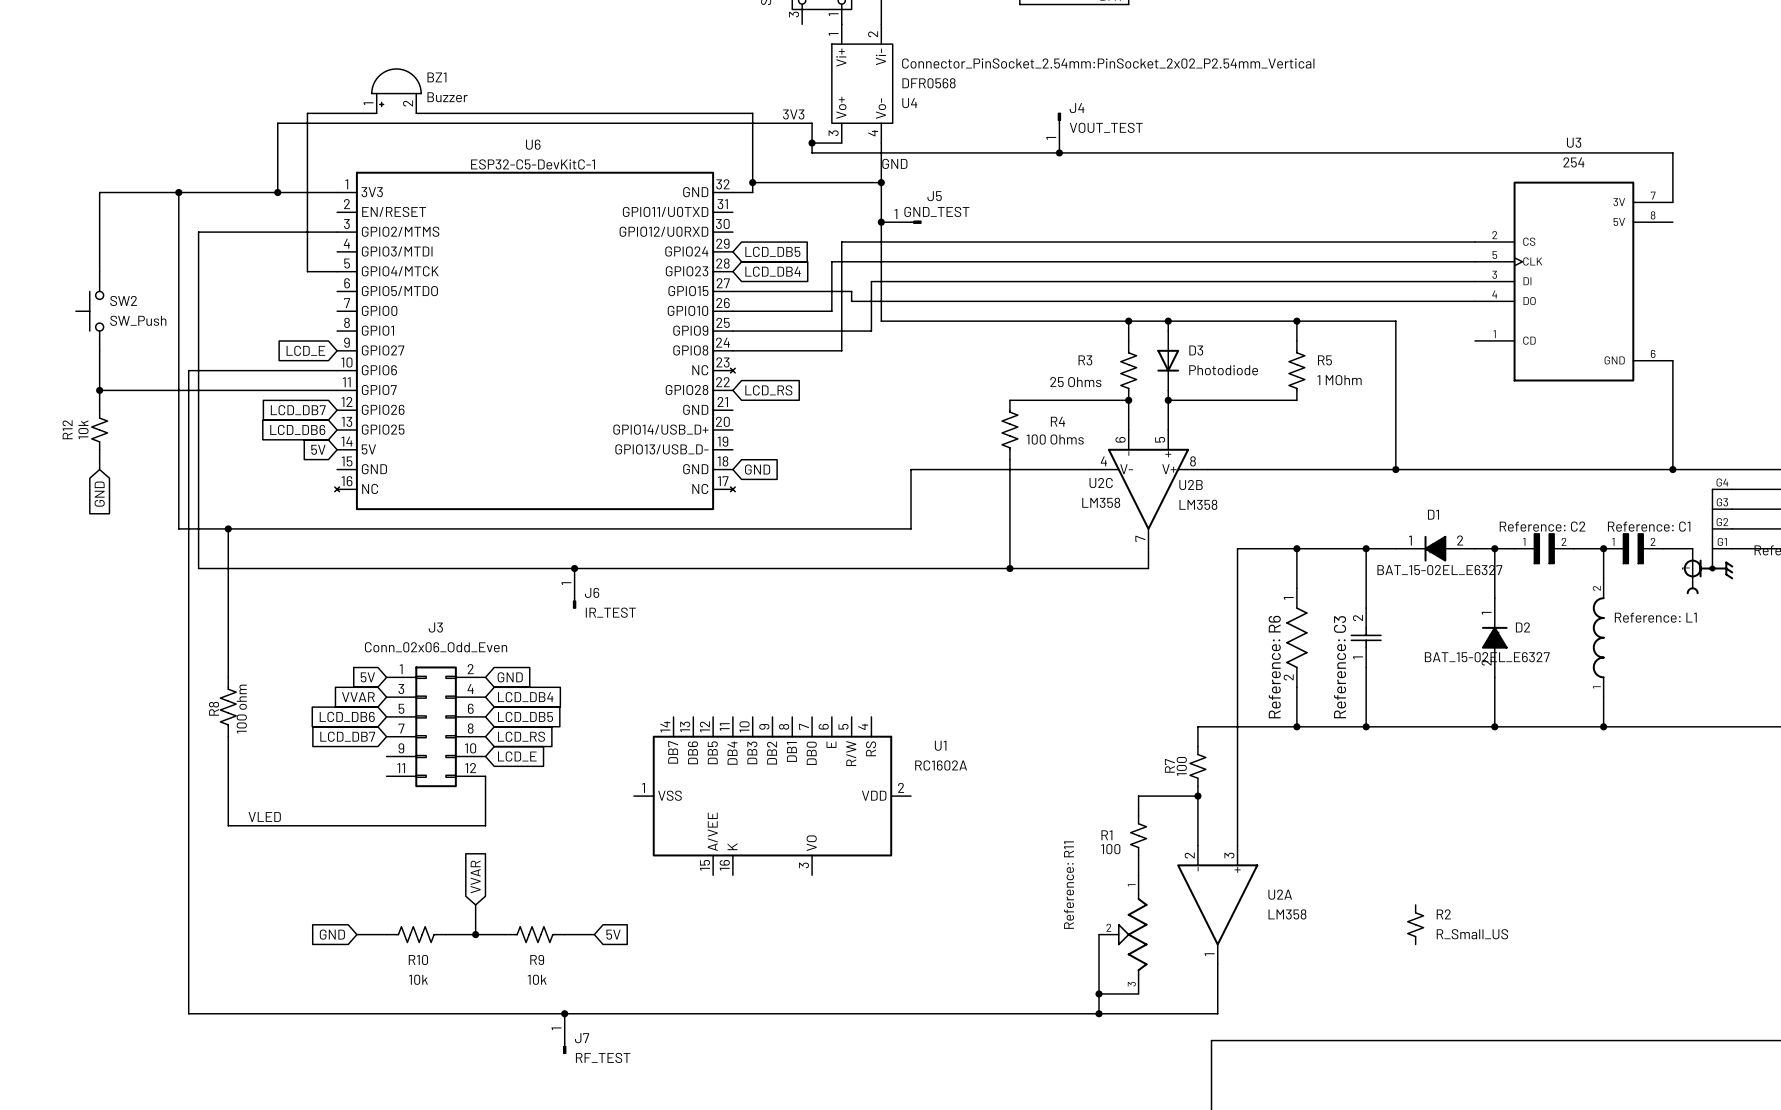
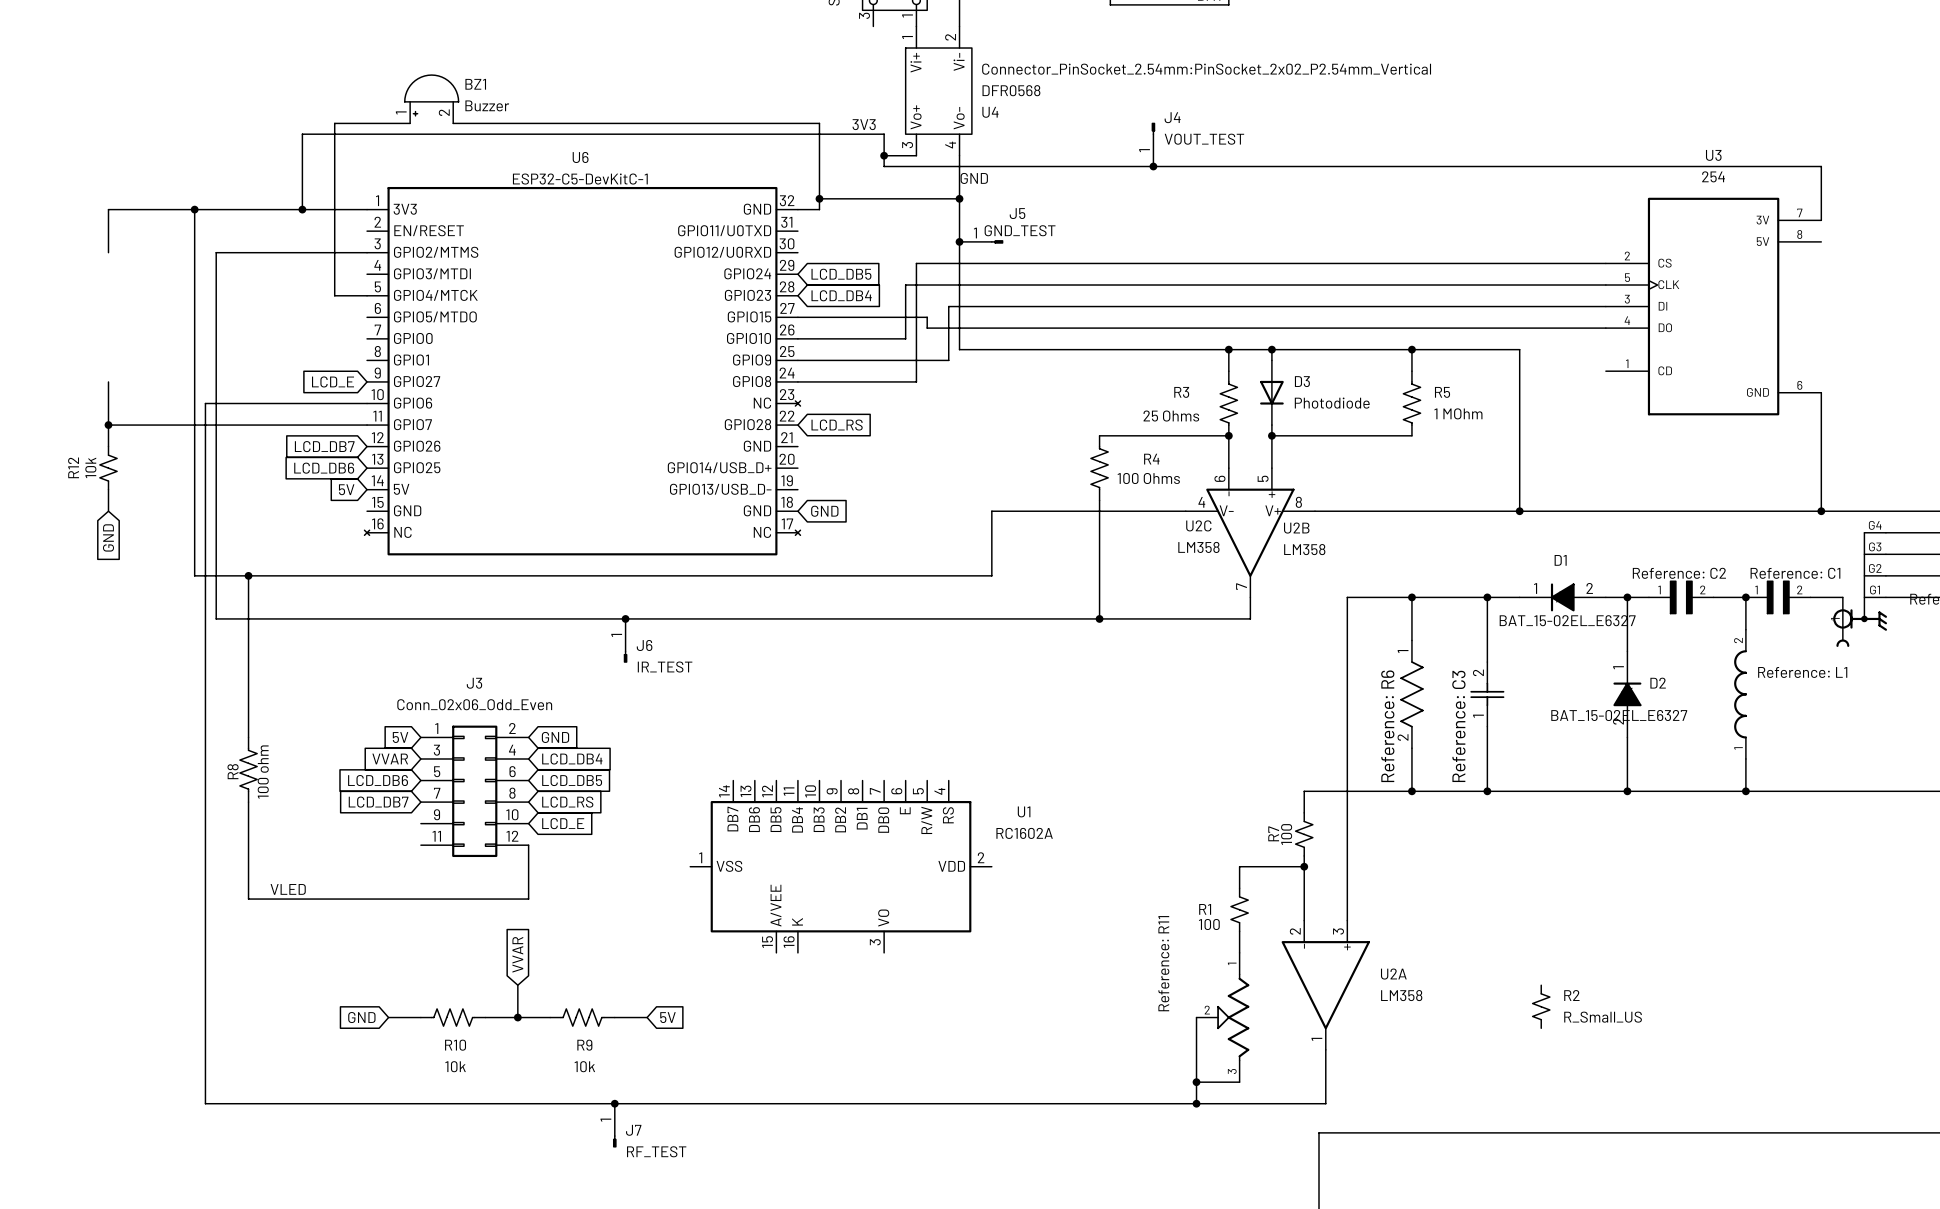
wire: (99, 232) (99, 271) -> none
SW2: SW_Push (89, 311) -> none

